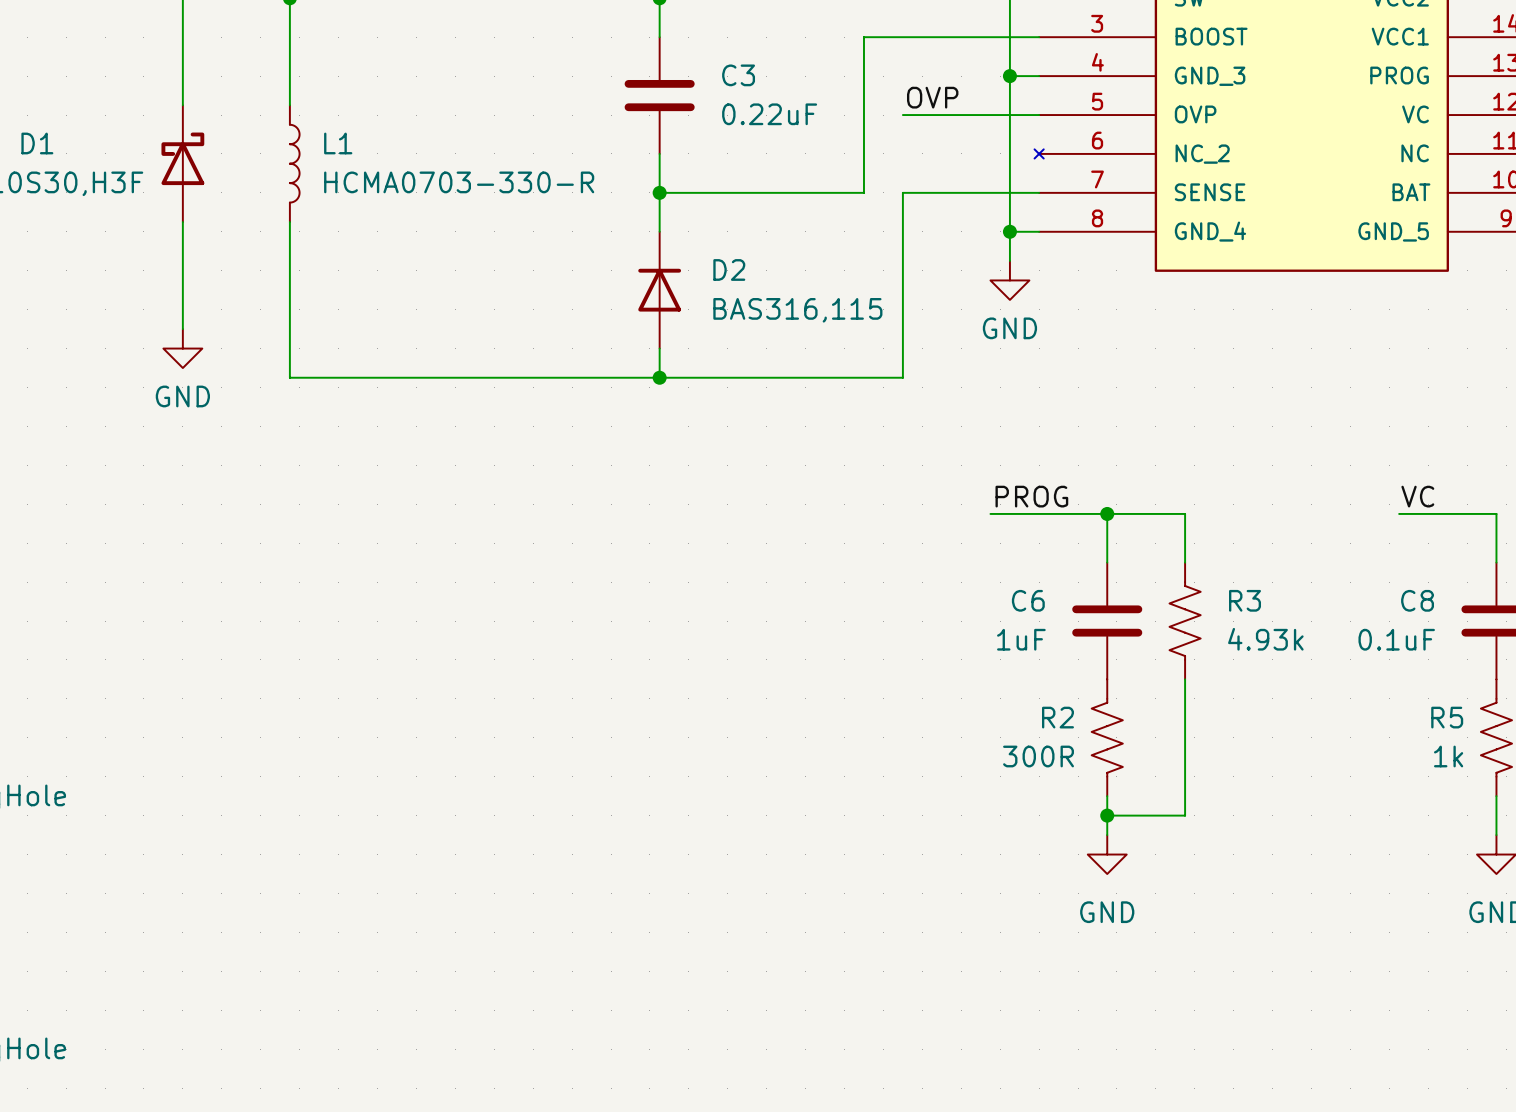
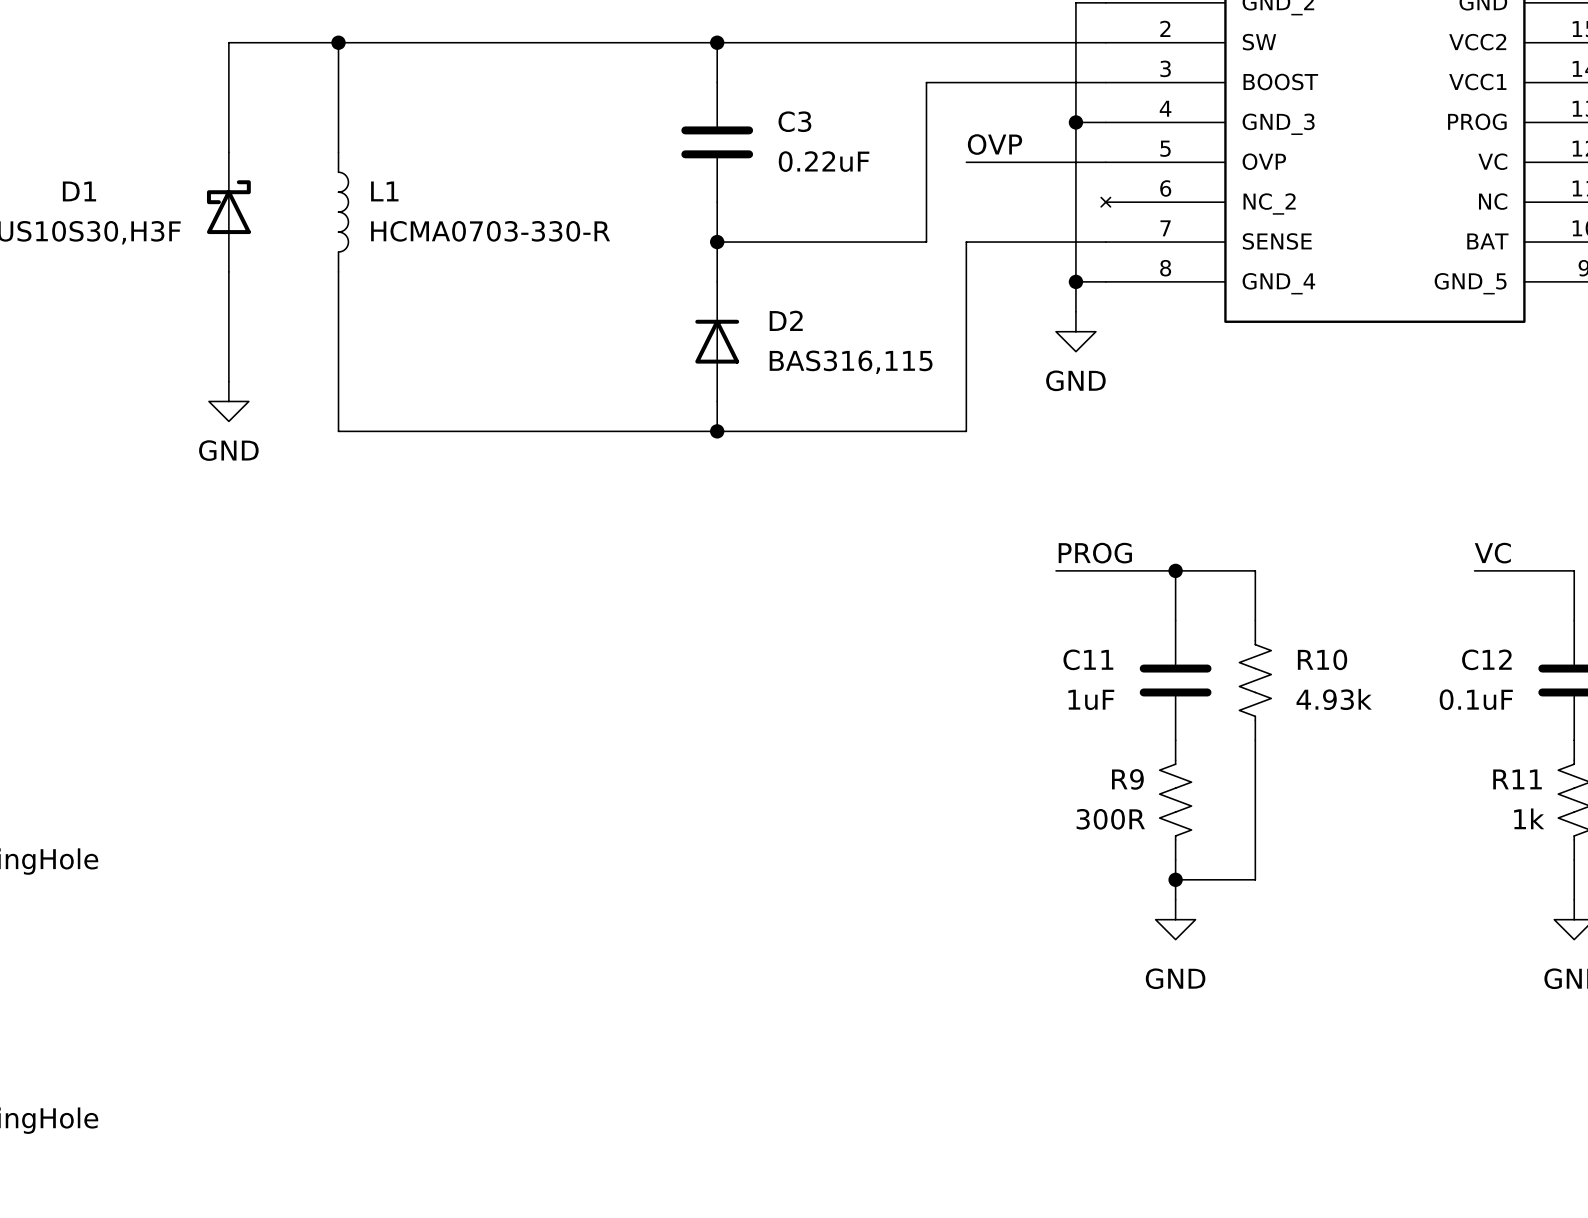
C6 name: C6 (1028, 600) -> C11 (1088, 659)
R3 name: R3 (1245, 600) -> R10 (1322, 659)
C8 name: C8 (1417, 600) -> C12 (1486, 659)
R2 name: R2 (1057, 717) -> R9 (1127, 779)
R5 name: R5 (1447, 717) -> R11 (1517, 779)

